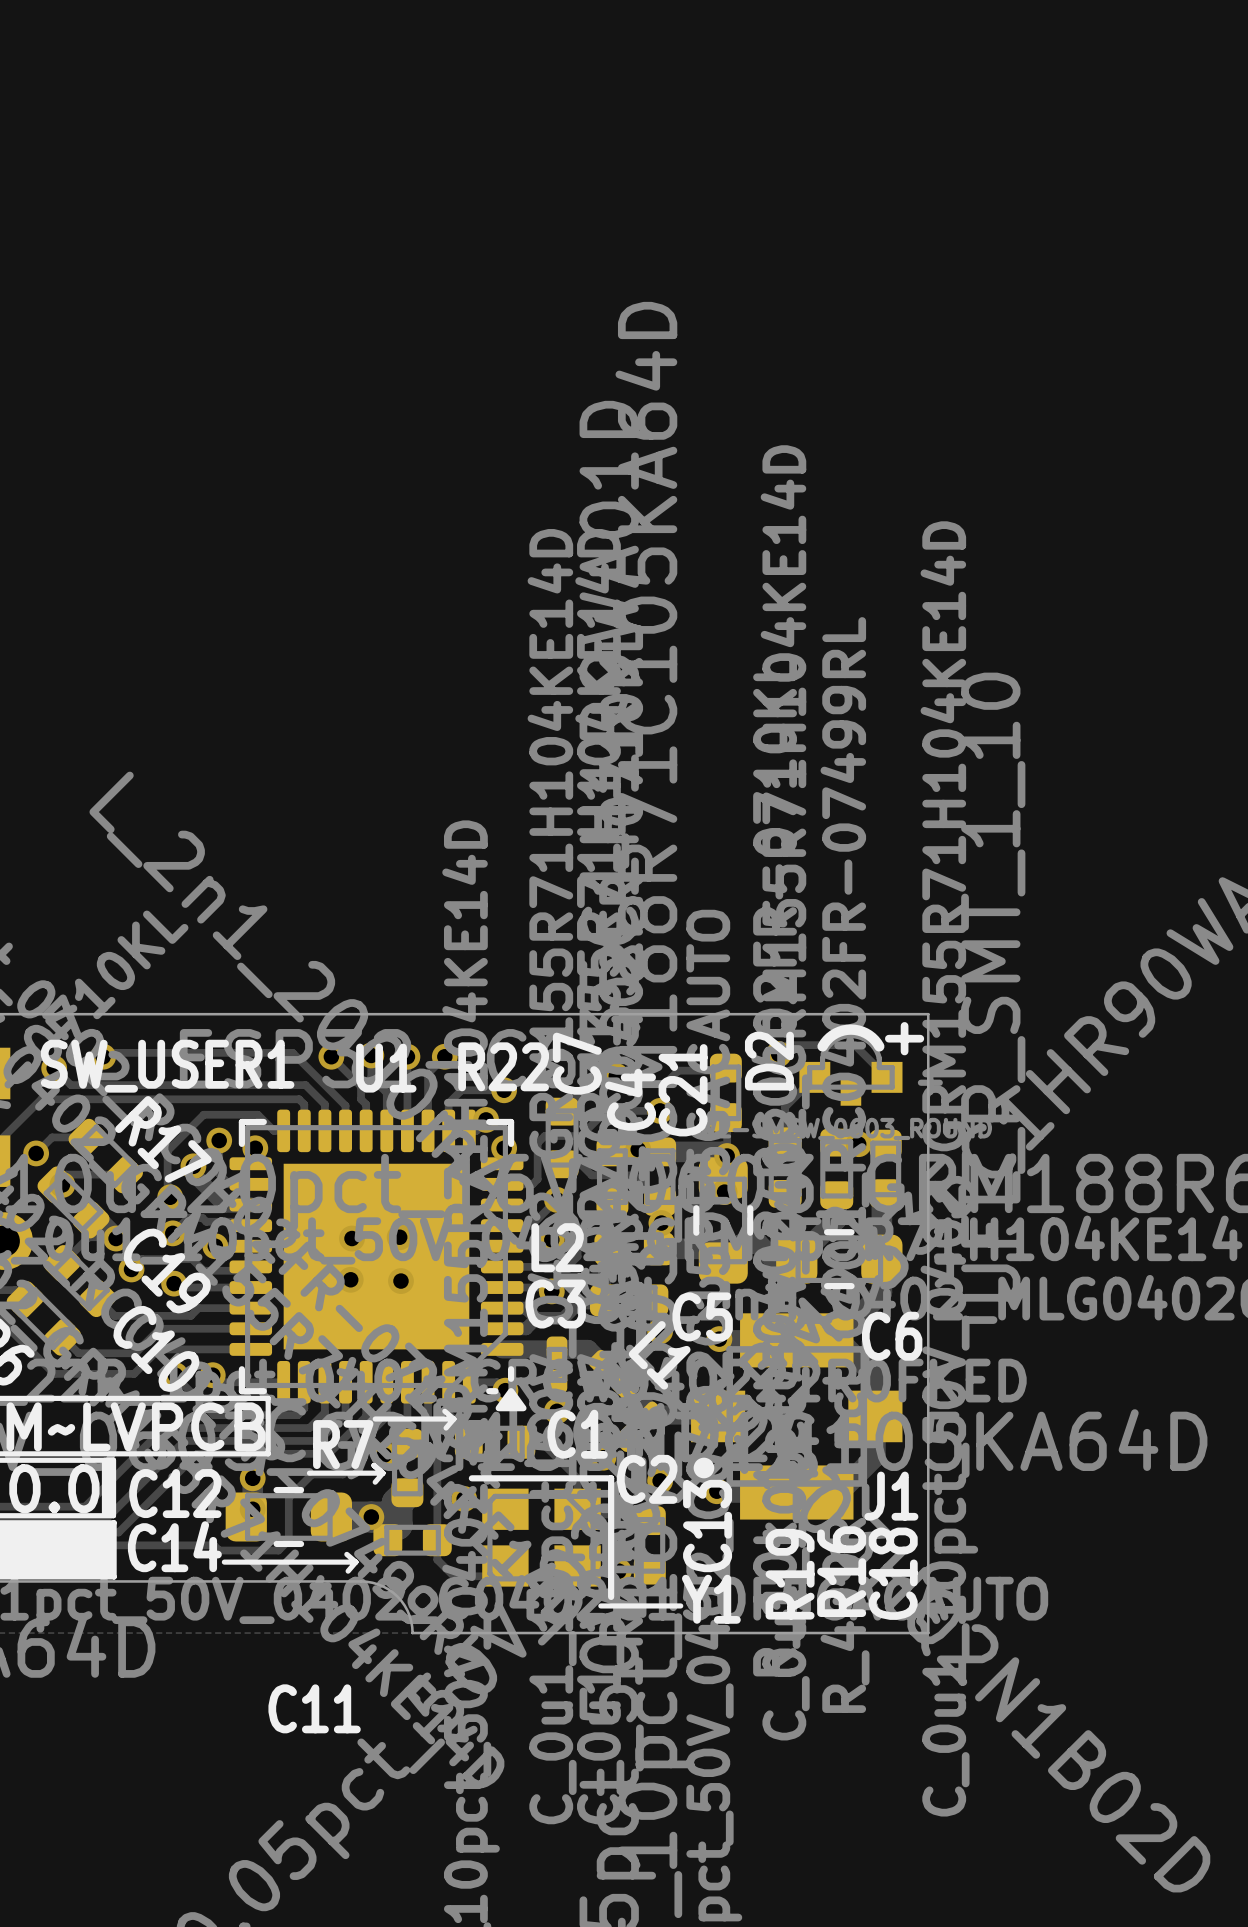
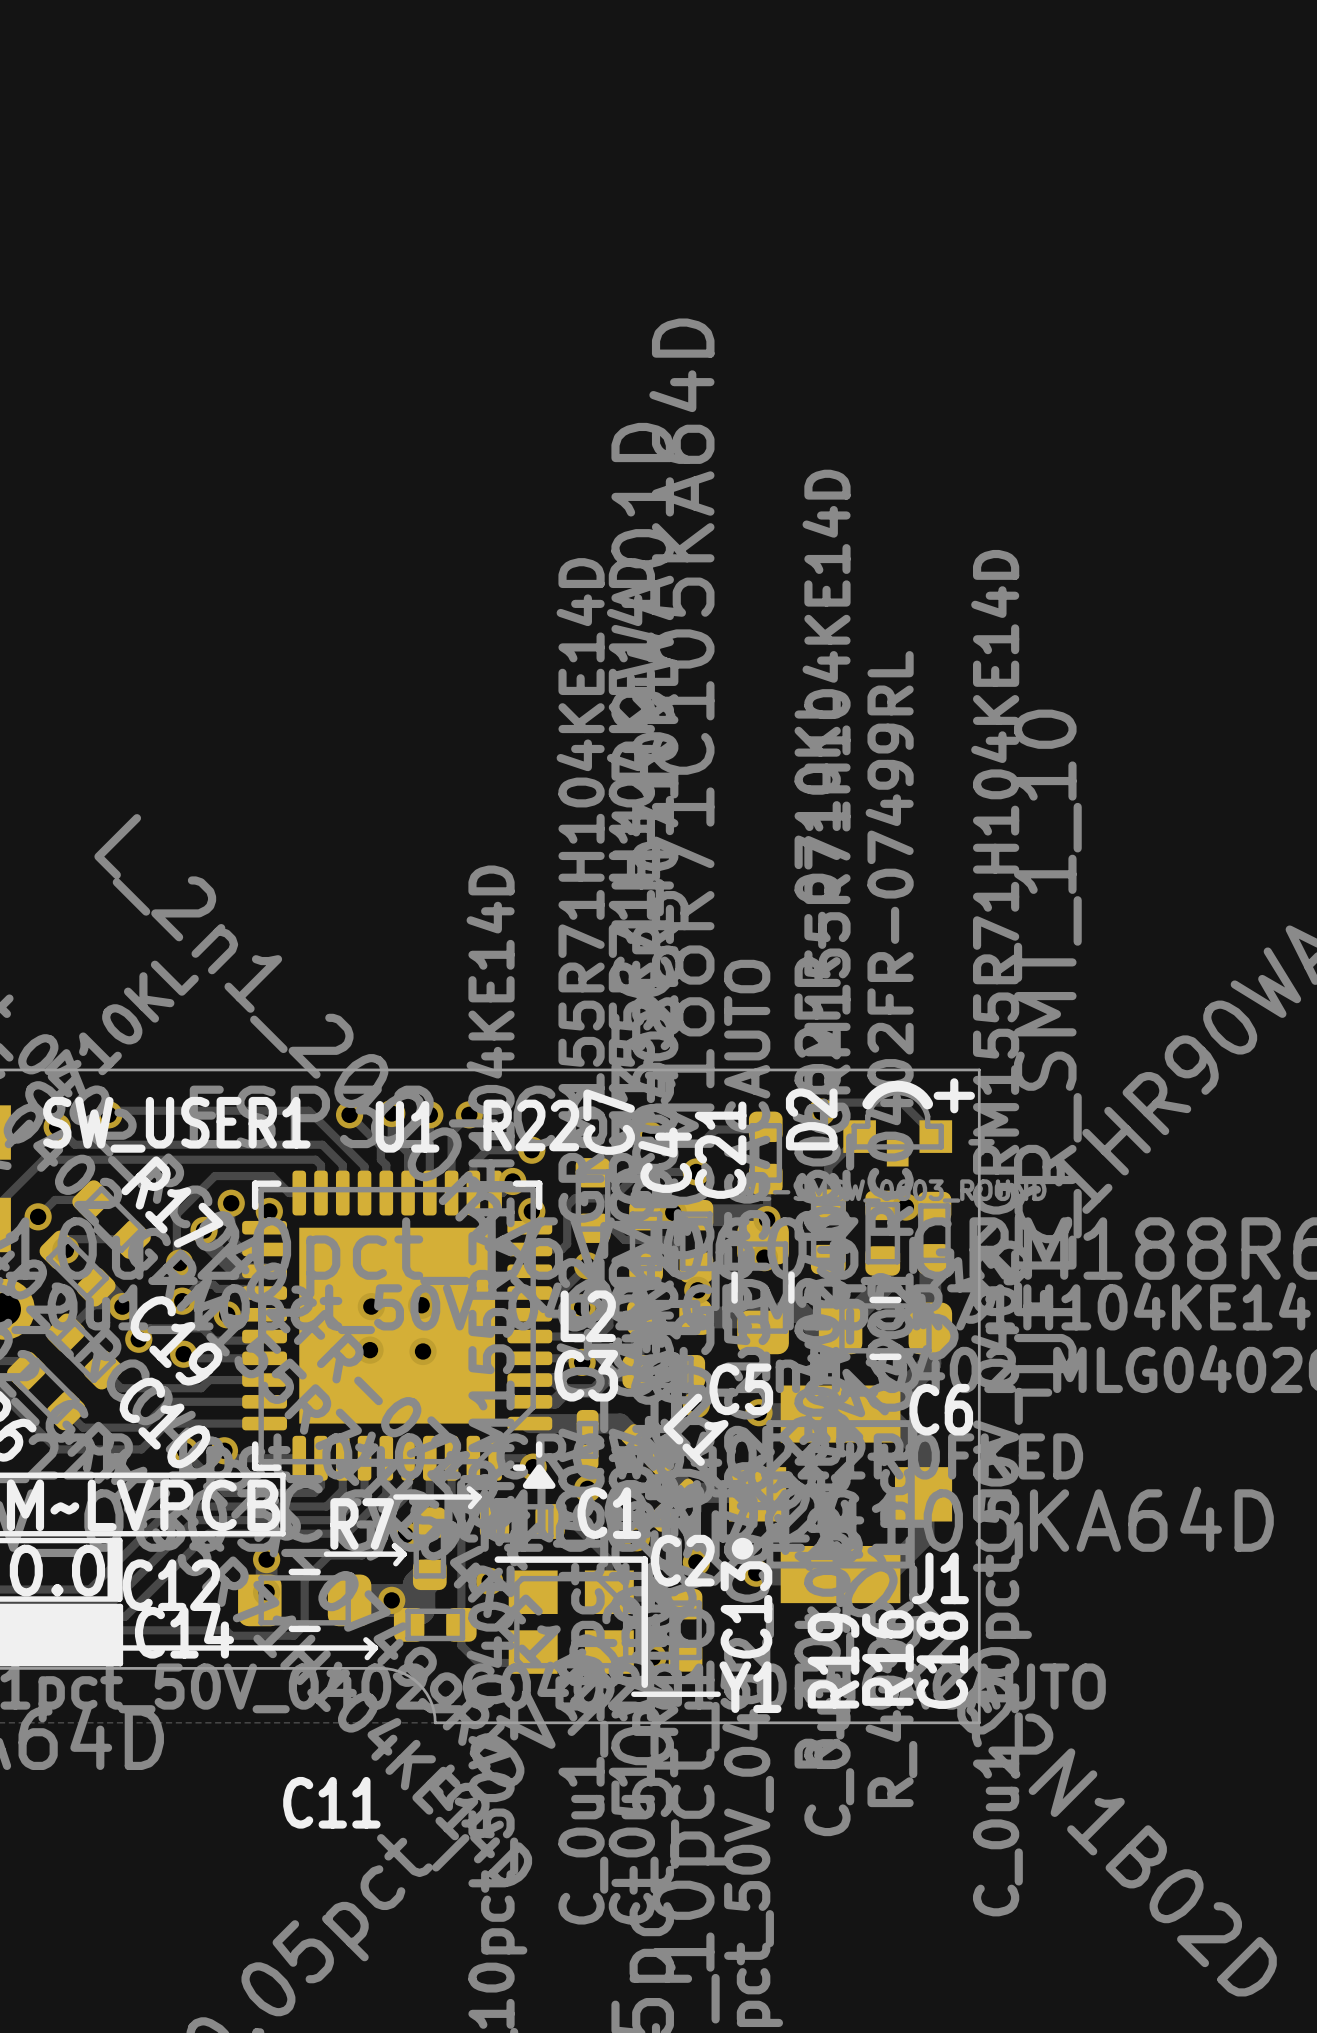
C12 name position: C12 (175, 1493) -> C12 (171, 1585)
line: none -> (123, 1647) (236, 1647)

